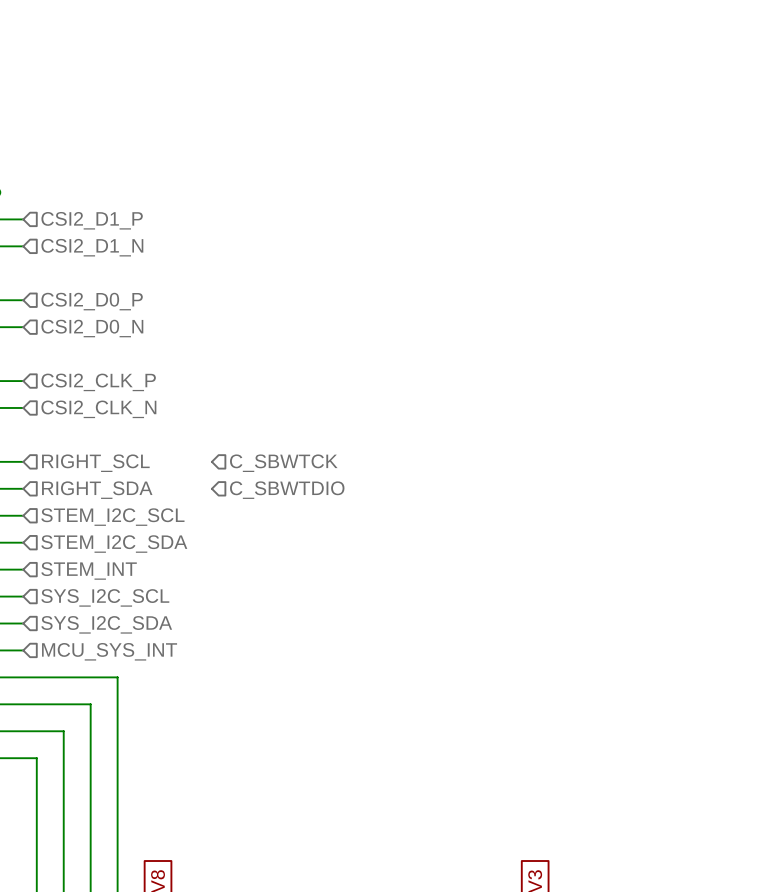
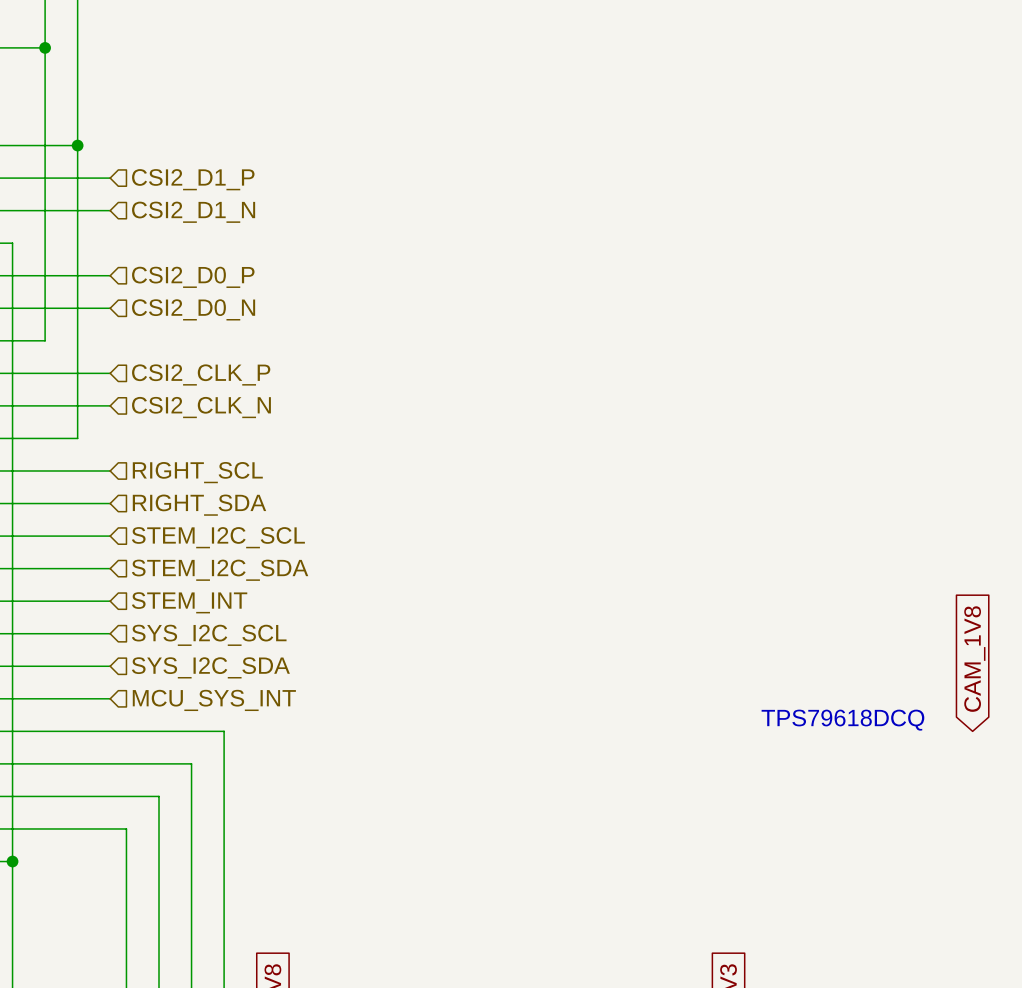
hierarchical label: C_SBWTCK (283, 463) -> none
hierarchical label: C_SBWTDIO (287, 490) -> none
global label: none -> CAM_1V8 (974, 659)
text: none -> TPS79618DCQ (842, 720)

